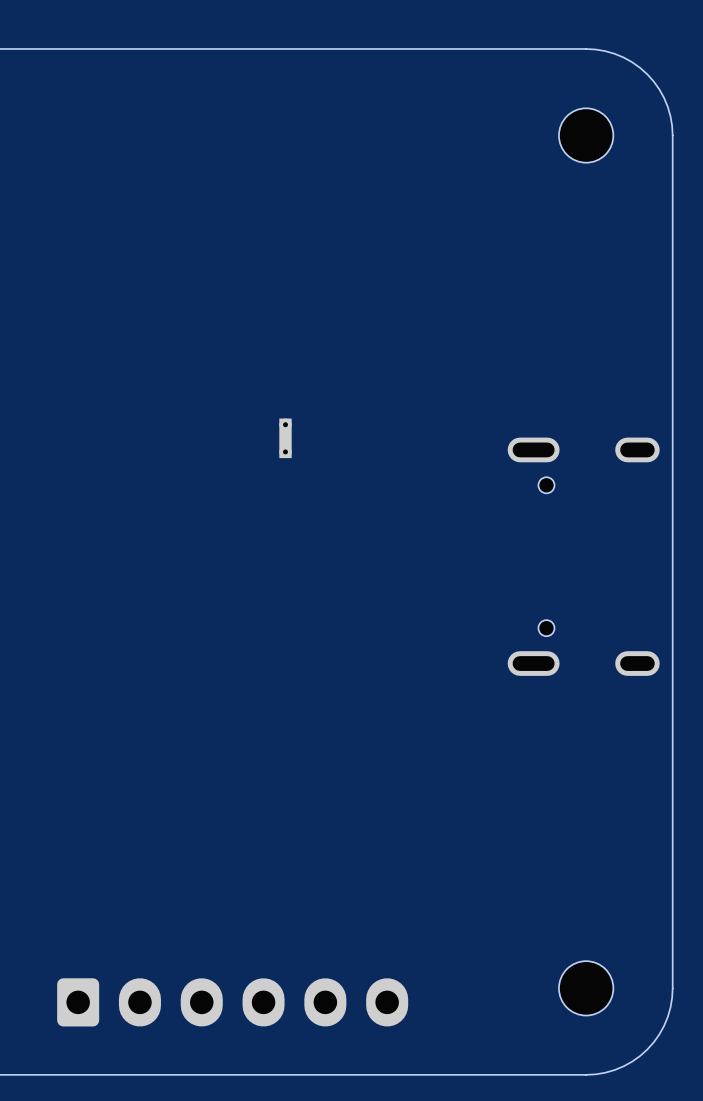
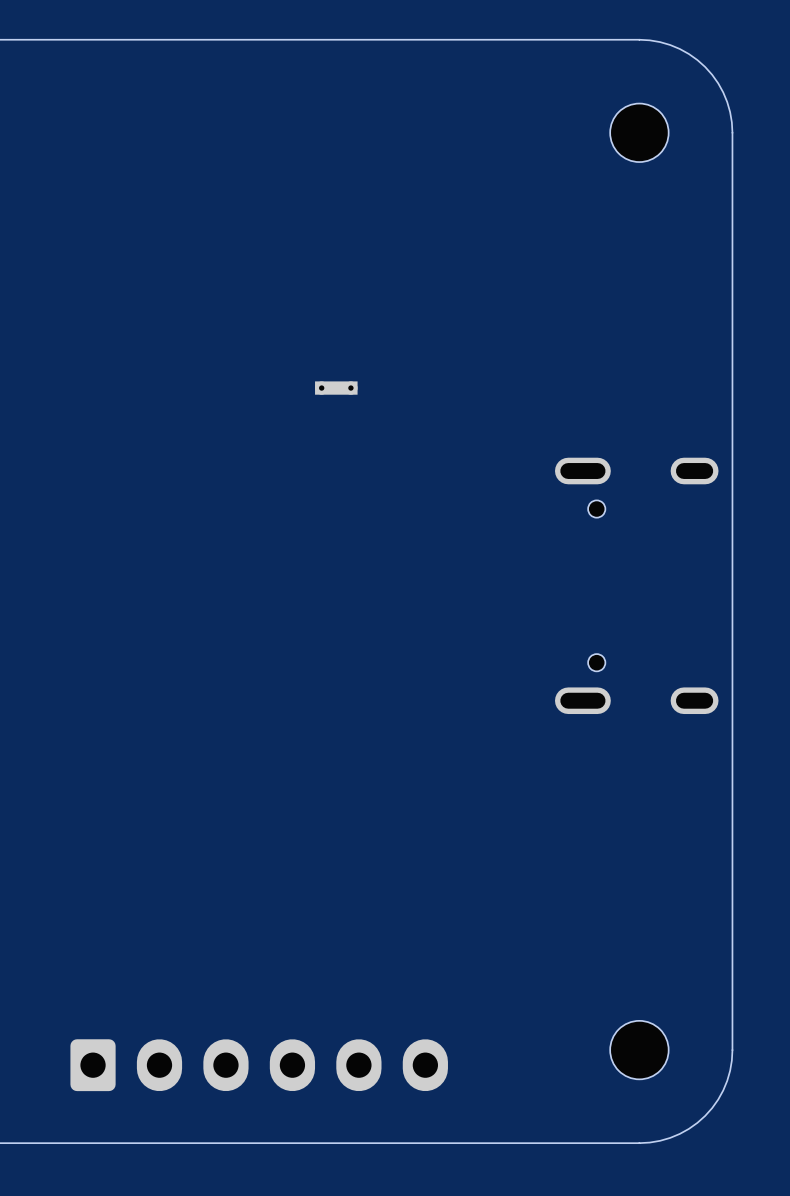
part rotation: 0° (285, 438) -> 90° clockwise (336, 388)
part position: (285, 438) -> (336, 388)

